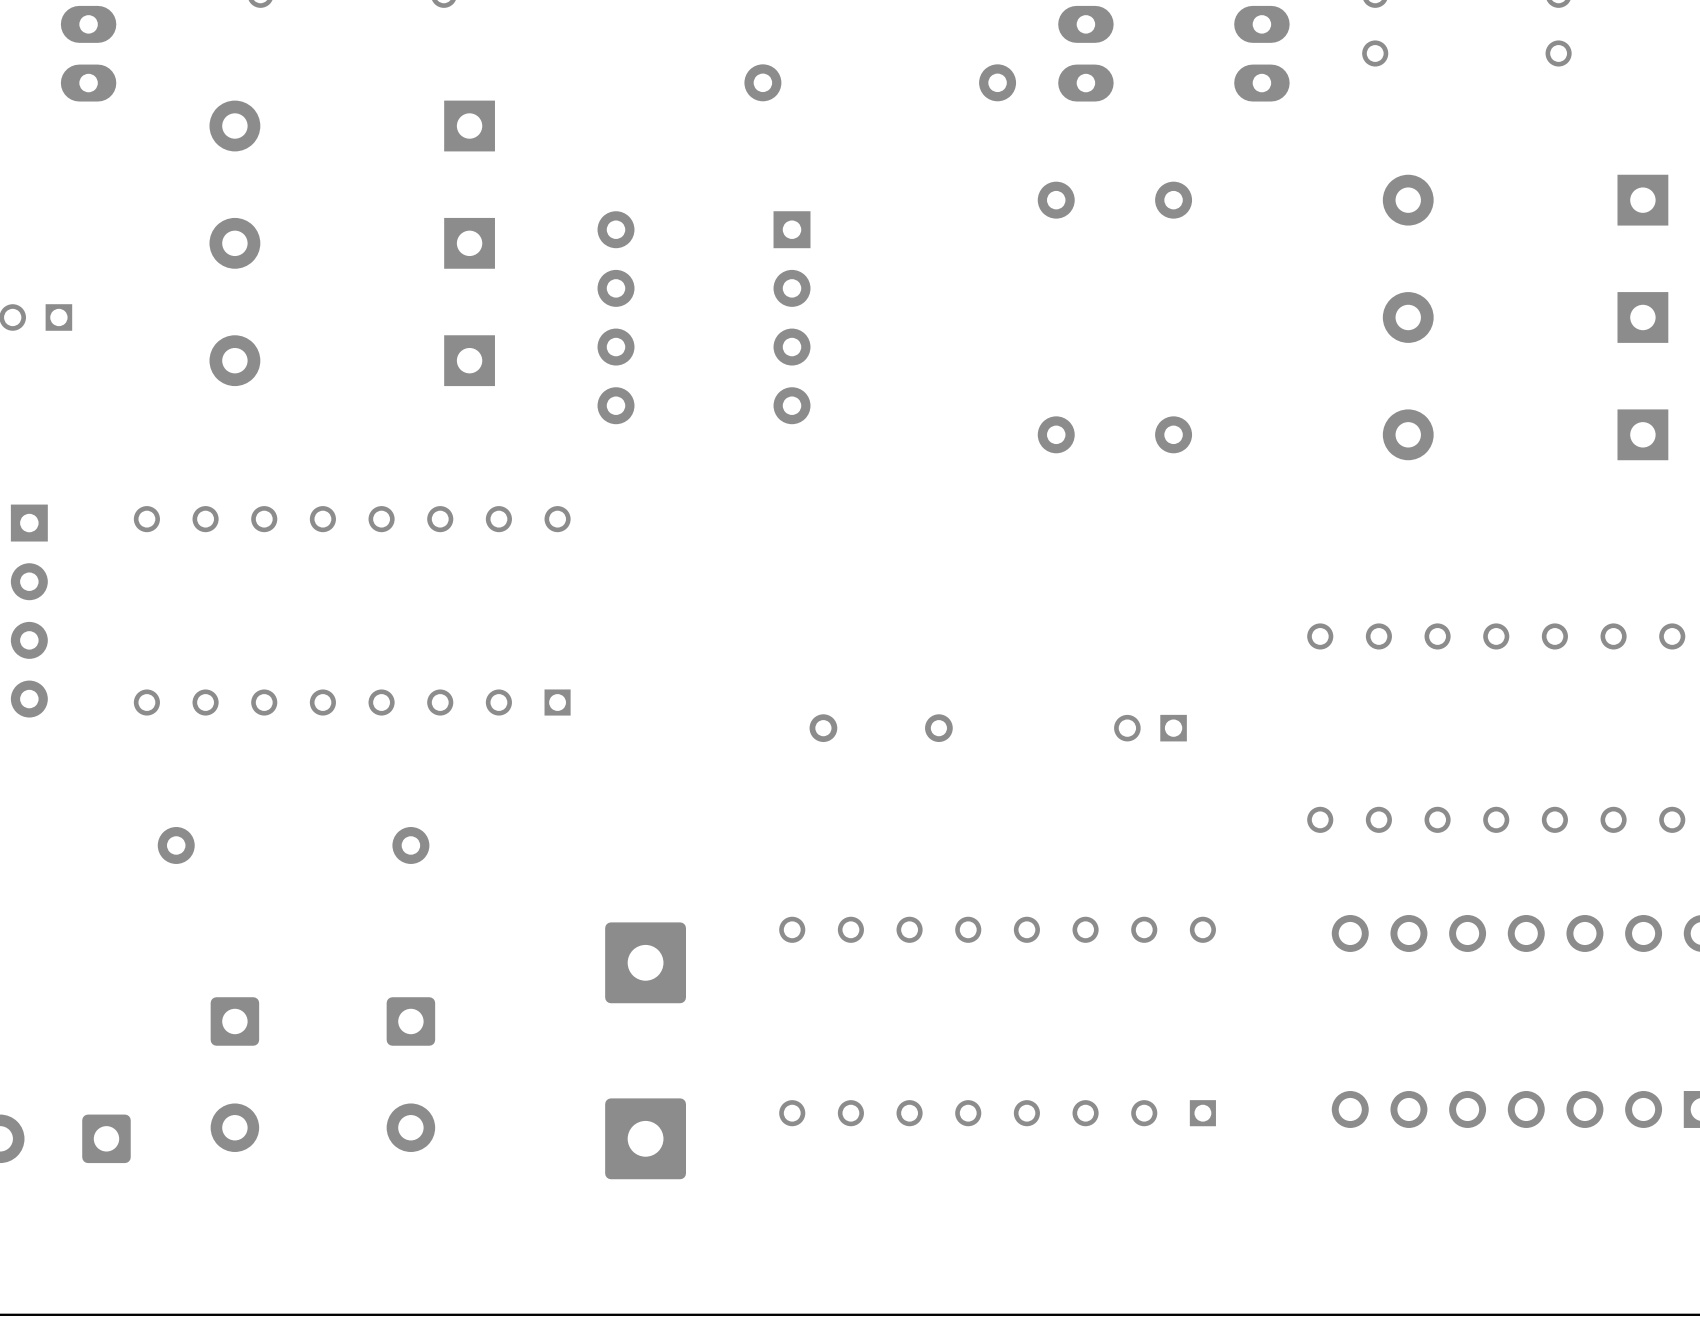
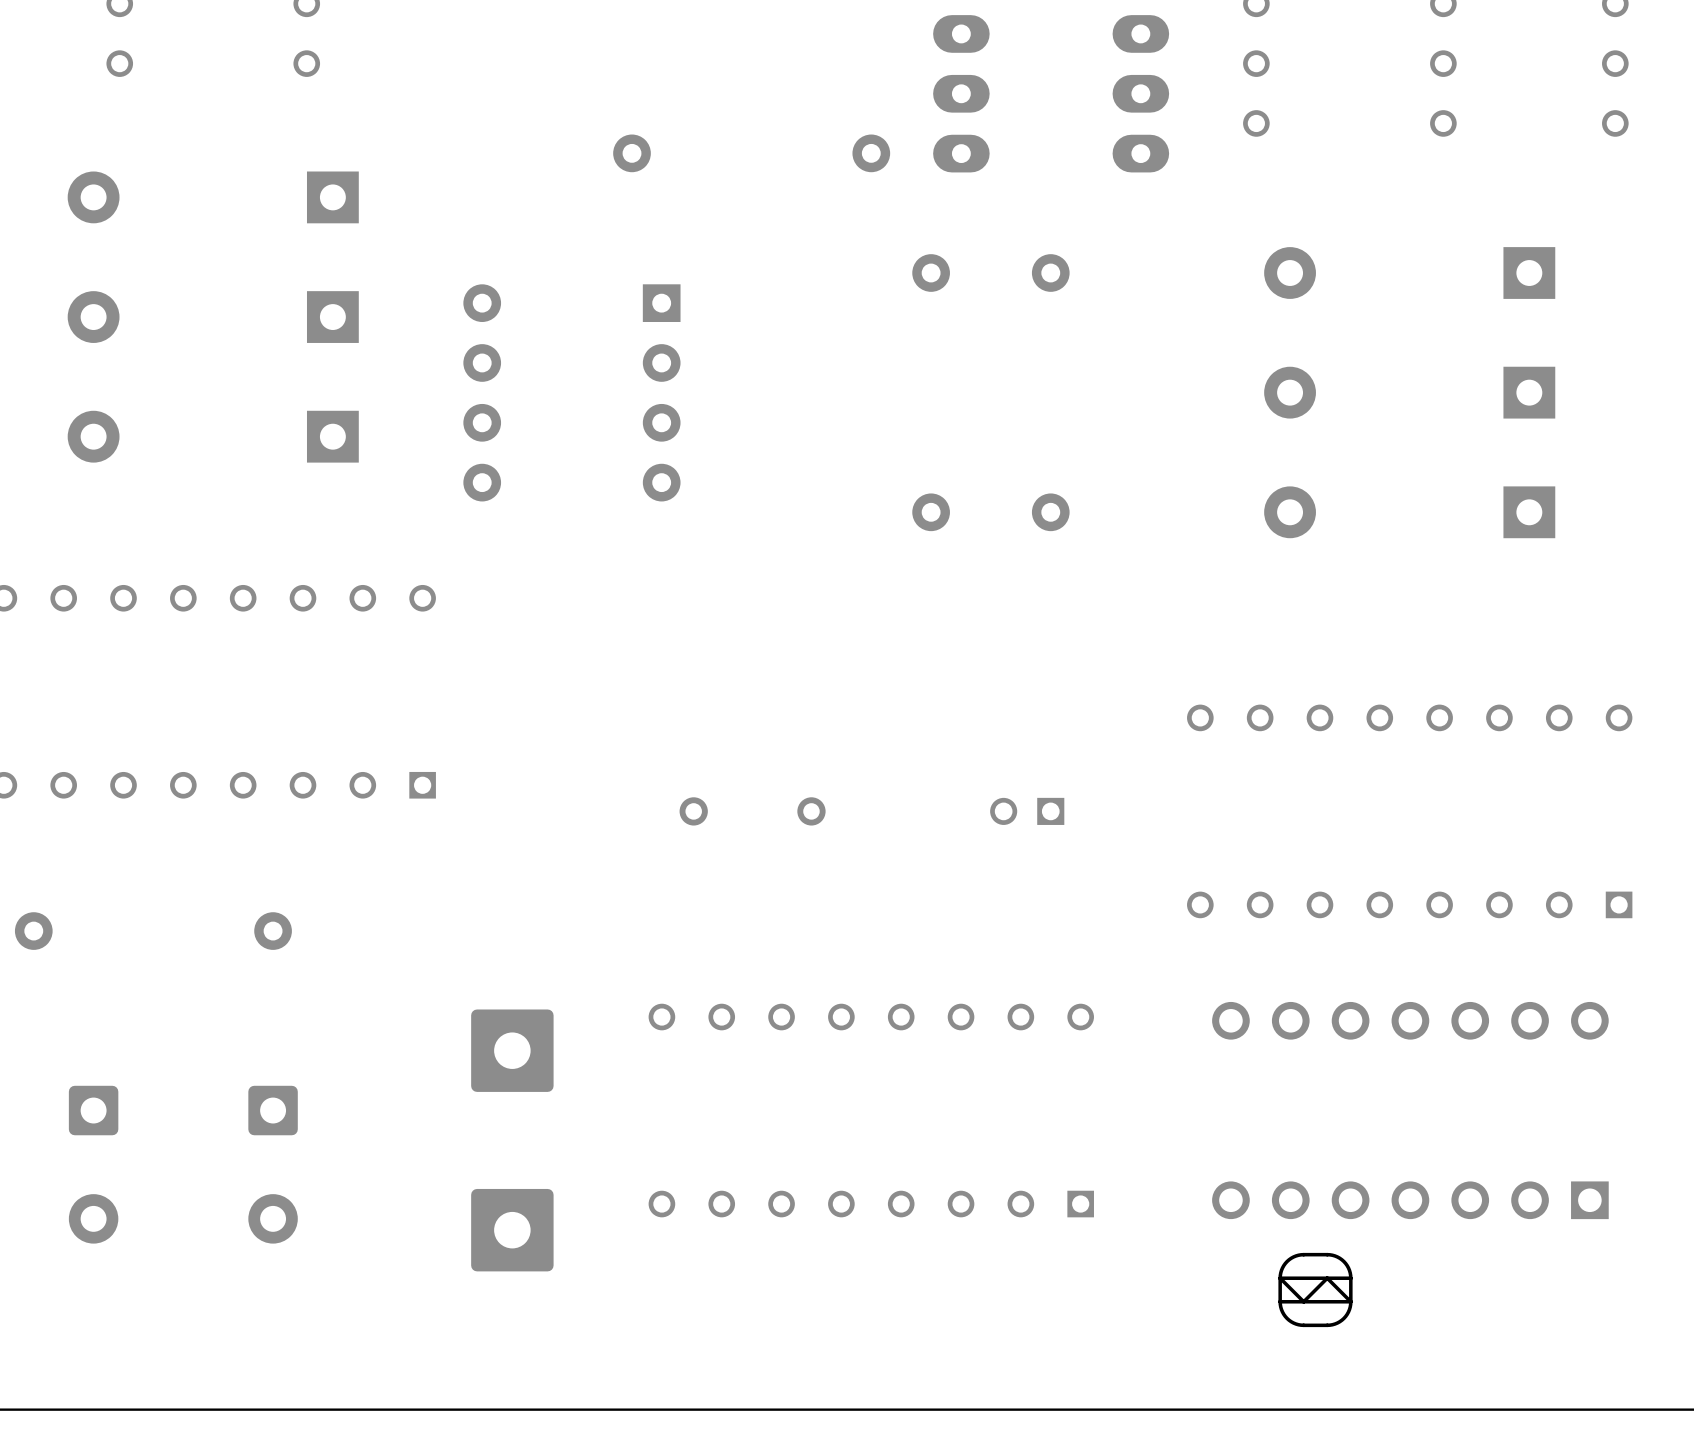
line: none -> (1280, 1278) (1303, 1301) (1327, 1278) (1350, 1301)
line: none -> (1280, 1278) (1280, 1301)
line: none -> (1350, 1278) (1350, 1301)
line: none -> (1350, 1278) (1280, 1278)
line: none -> (1350, 1278) (1349, 1270) (1343, 1261) (1337, 1257) (1327, 1254) (1301, 1254) (1293, 1257) (1283, 1265) (1280, 1278)
line: none -> (1350, 1301) (1280, 1301)
line: none -> (1350, 1301) (1348, 1311) (1343, 1318) (1337, 1322) (1327, 1325) (1301, 1325) (1293, 1322) (1283, 1314) (1280, 1301)

